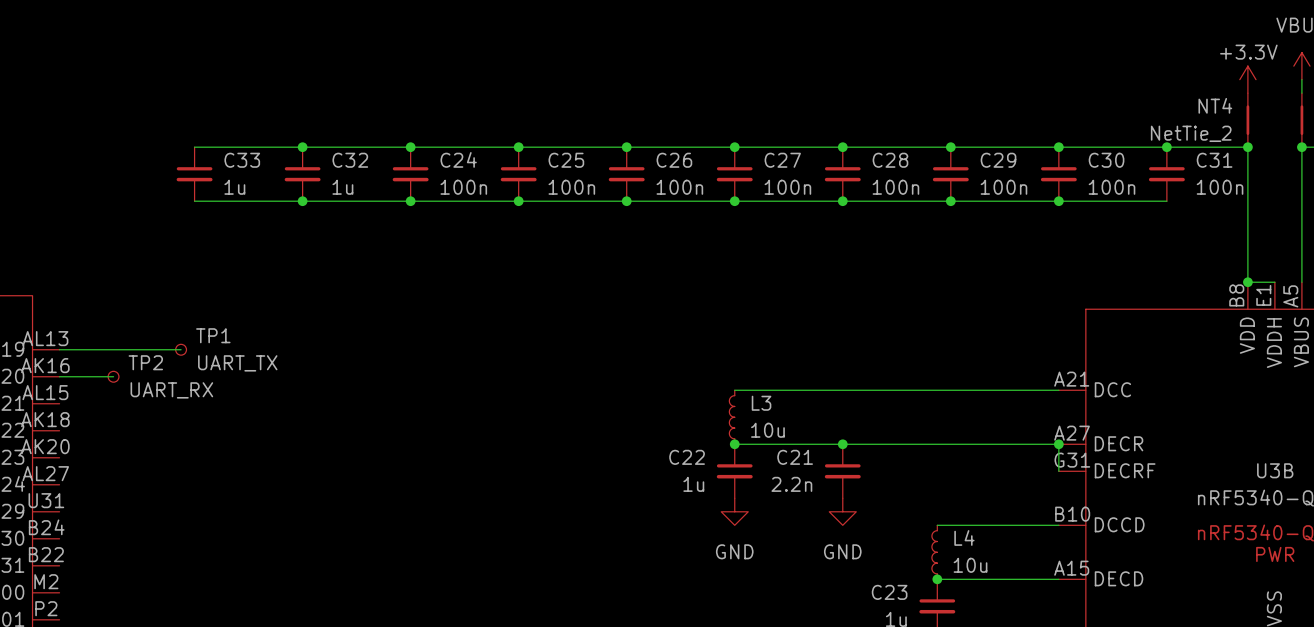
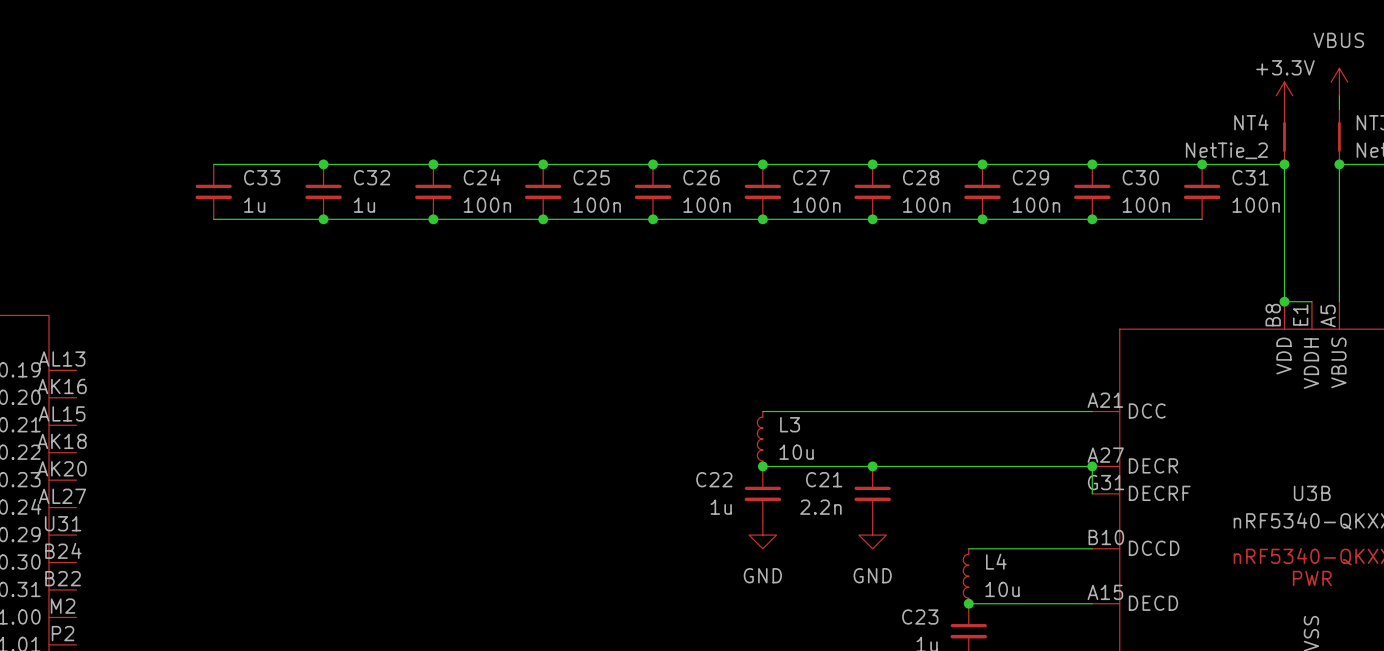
wire: (59, 349) (181, 349) -> none
TP1: UART_TX (181, 349) -> none
wire: (59, 376) (113, 376) -> none
TP2: UART_RX (113, 376) -> none

